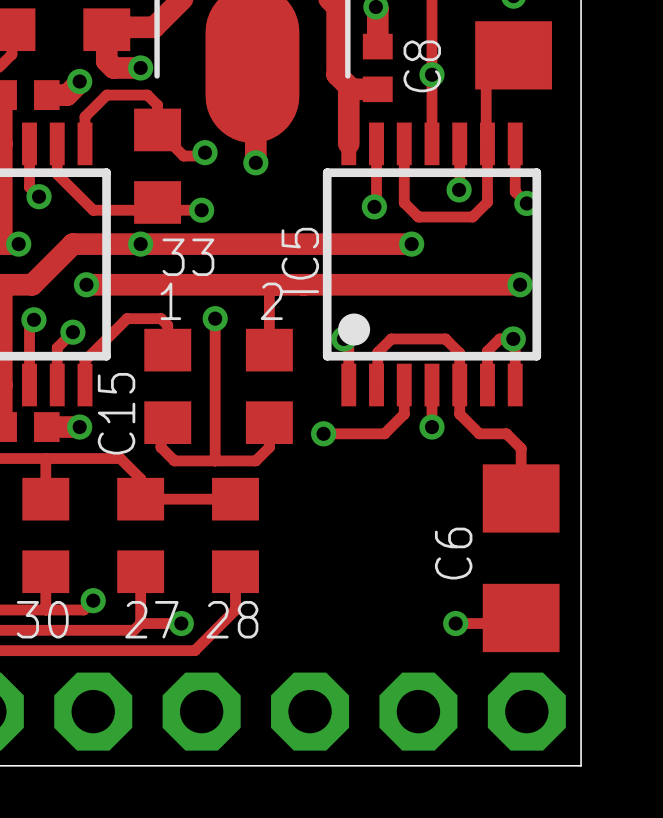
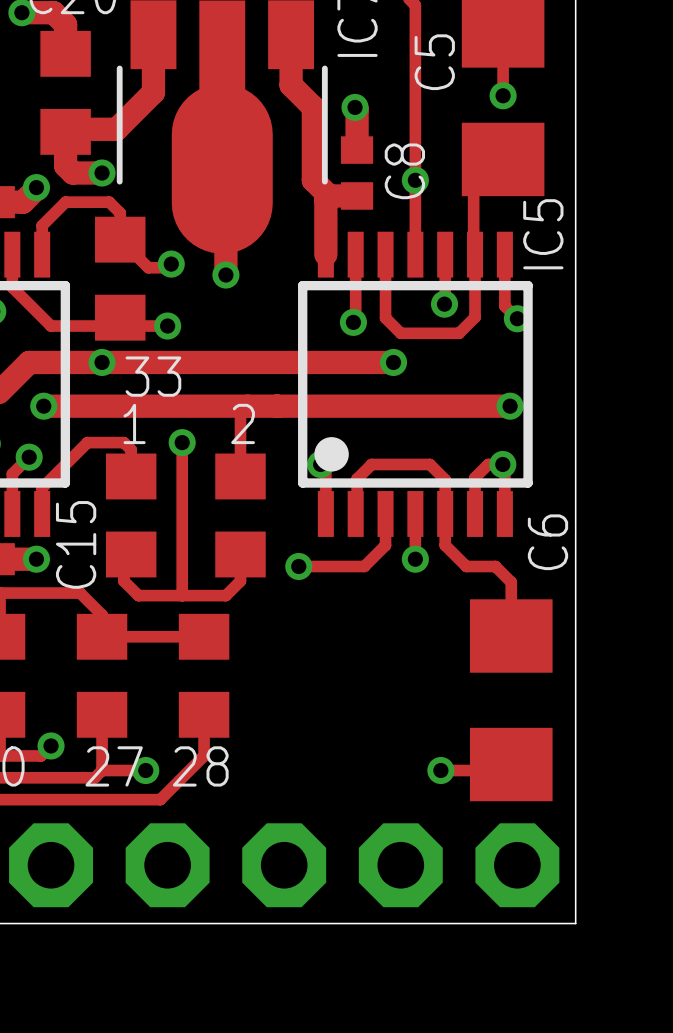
IC5 name position: IC5 (300, 260) -> IC5 (543, 234)
C6 name position: C6 (453, 553) -> C6 (547, 542)

